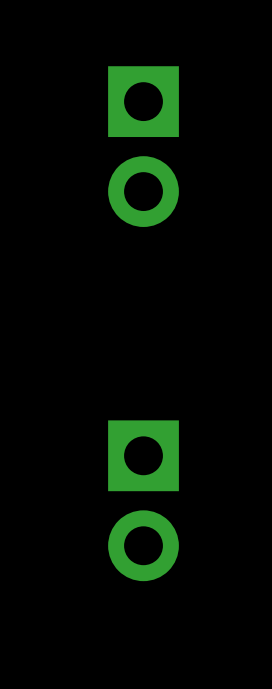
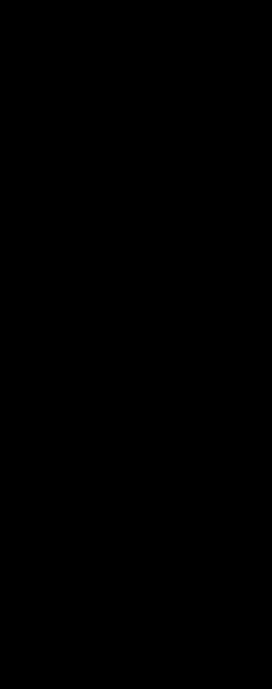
part: (143, 146) -> none
part: (143, 500) -> none

